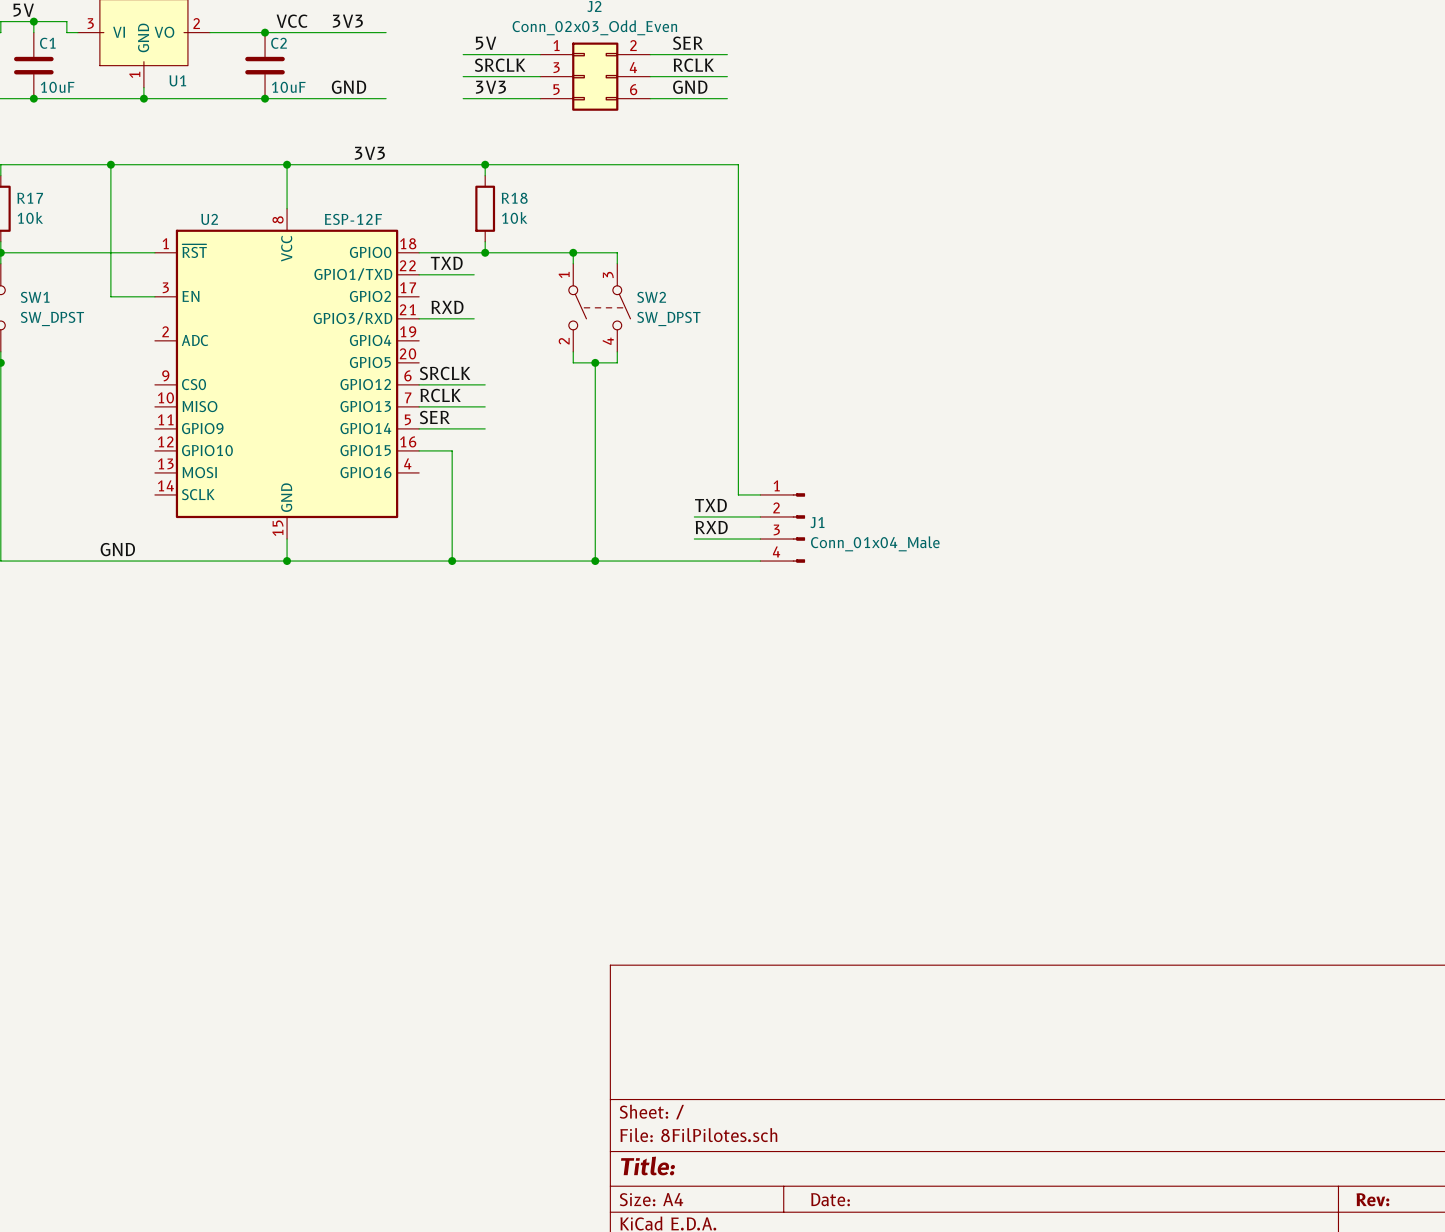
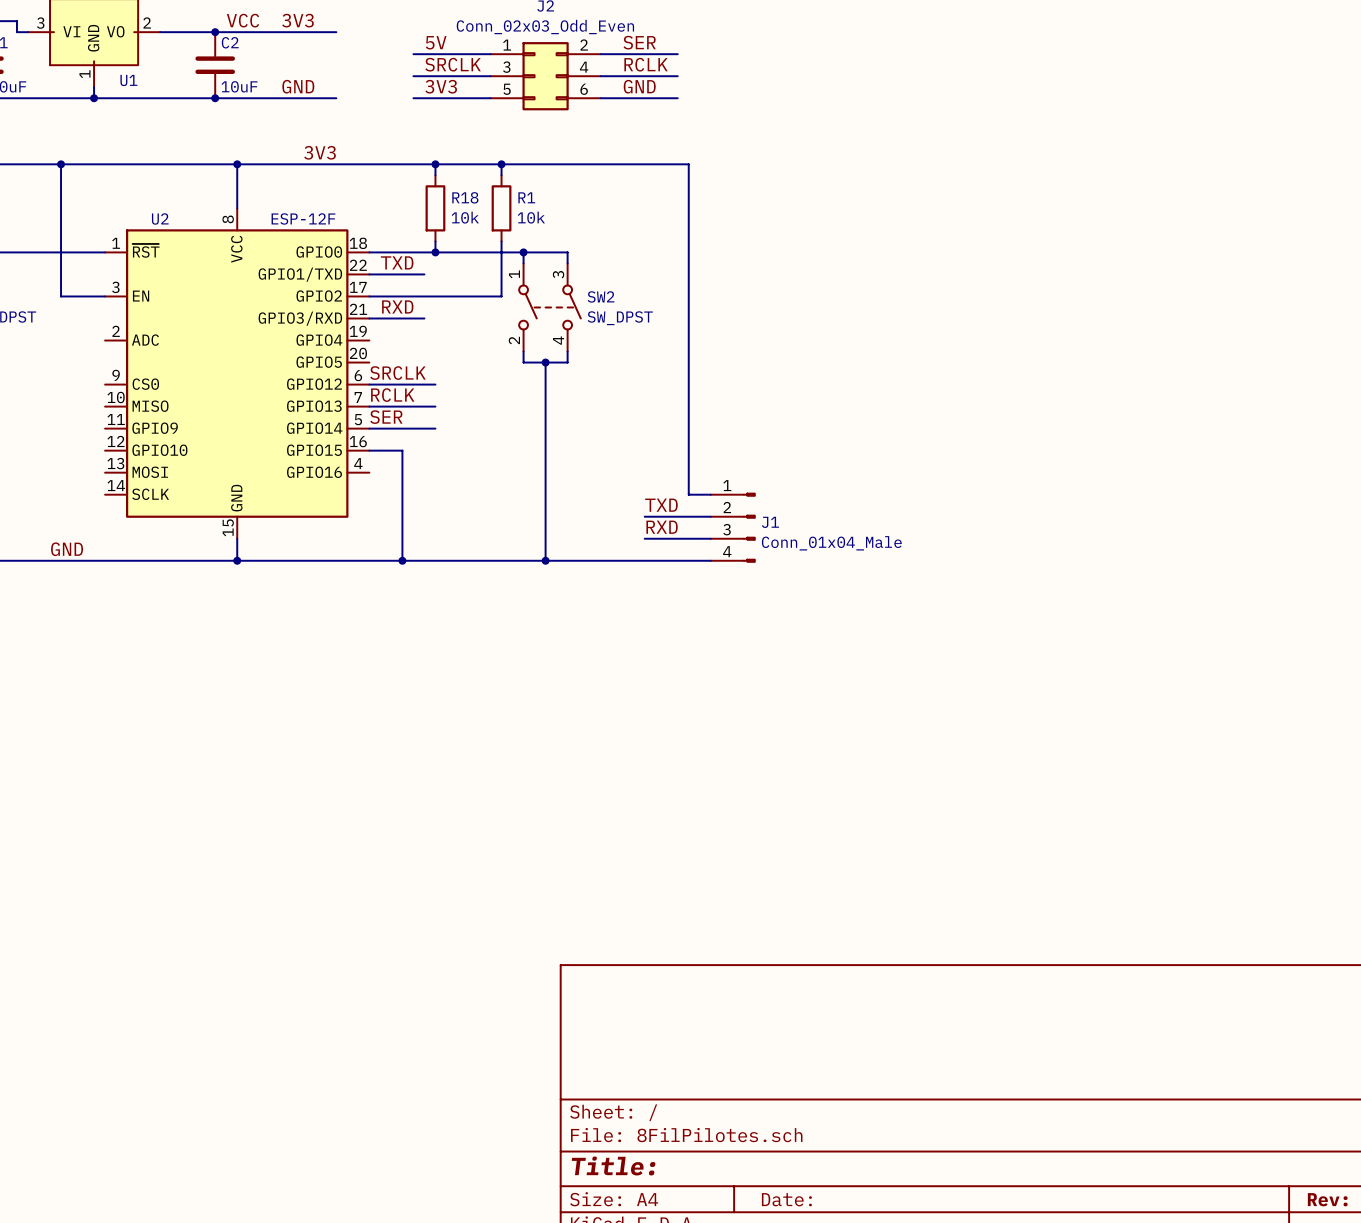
wire: none -> (501, 164) (501, 175)
junction: none -> (501, 164)
R1: none -> 10k (501, 208)
wire: none -> (501, 241) (501, 296) (369, 296)

